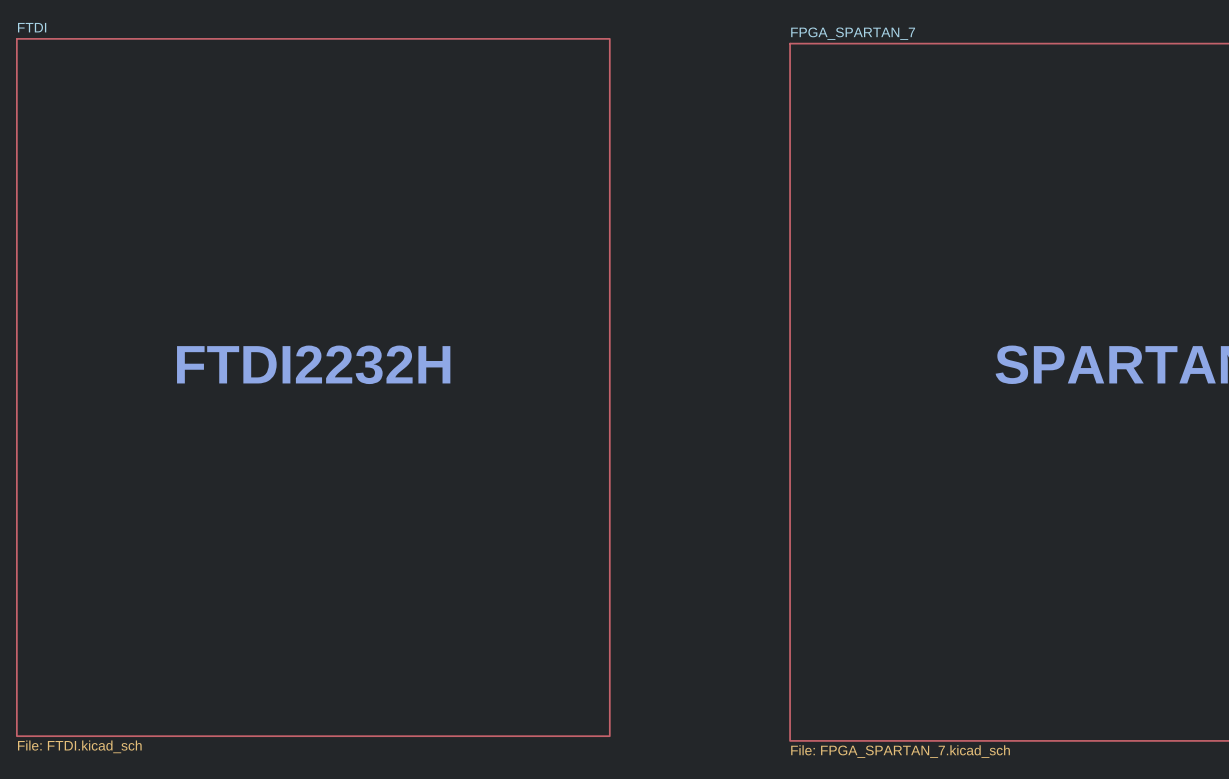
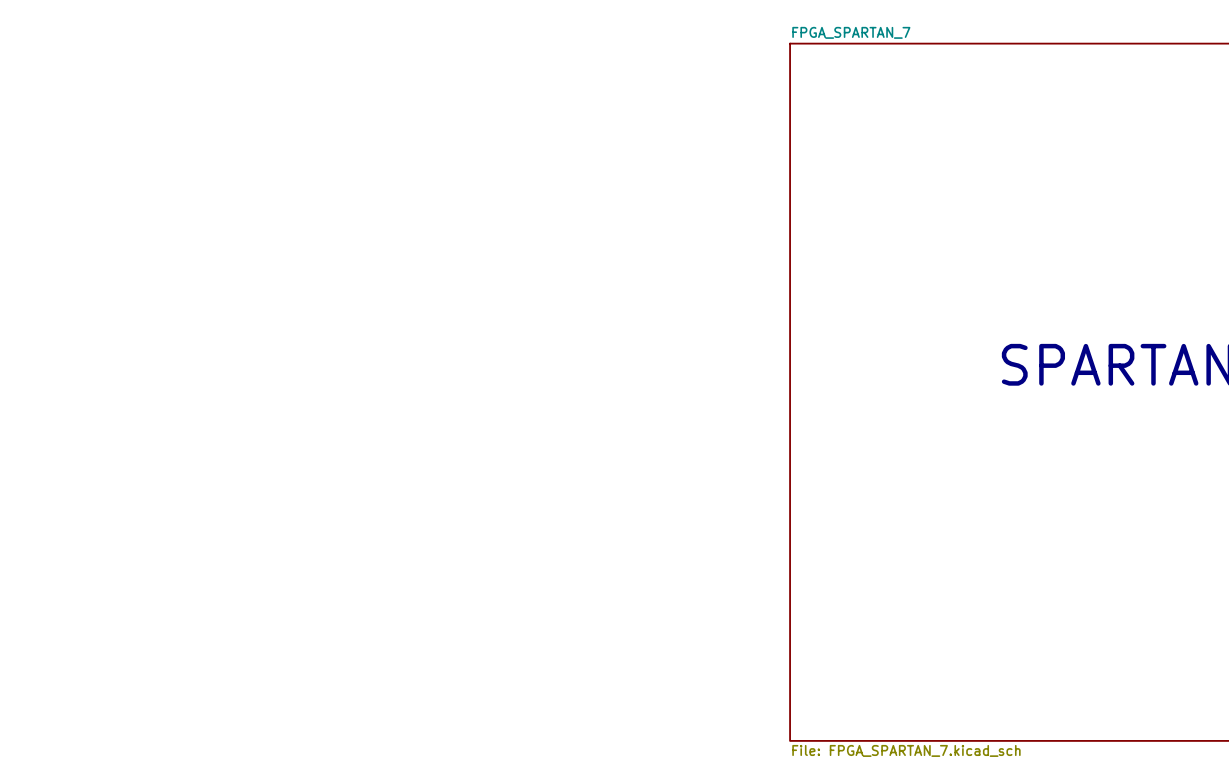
text: FTDI2232H (313, 364) -> none
sheet FTDI: File: FTDI.kicad_sch (313, 387) -> none

